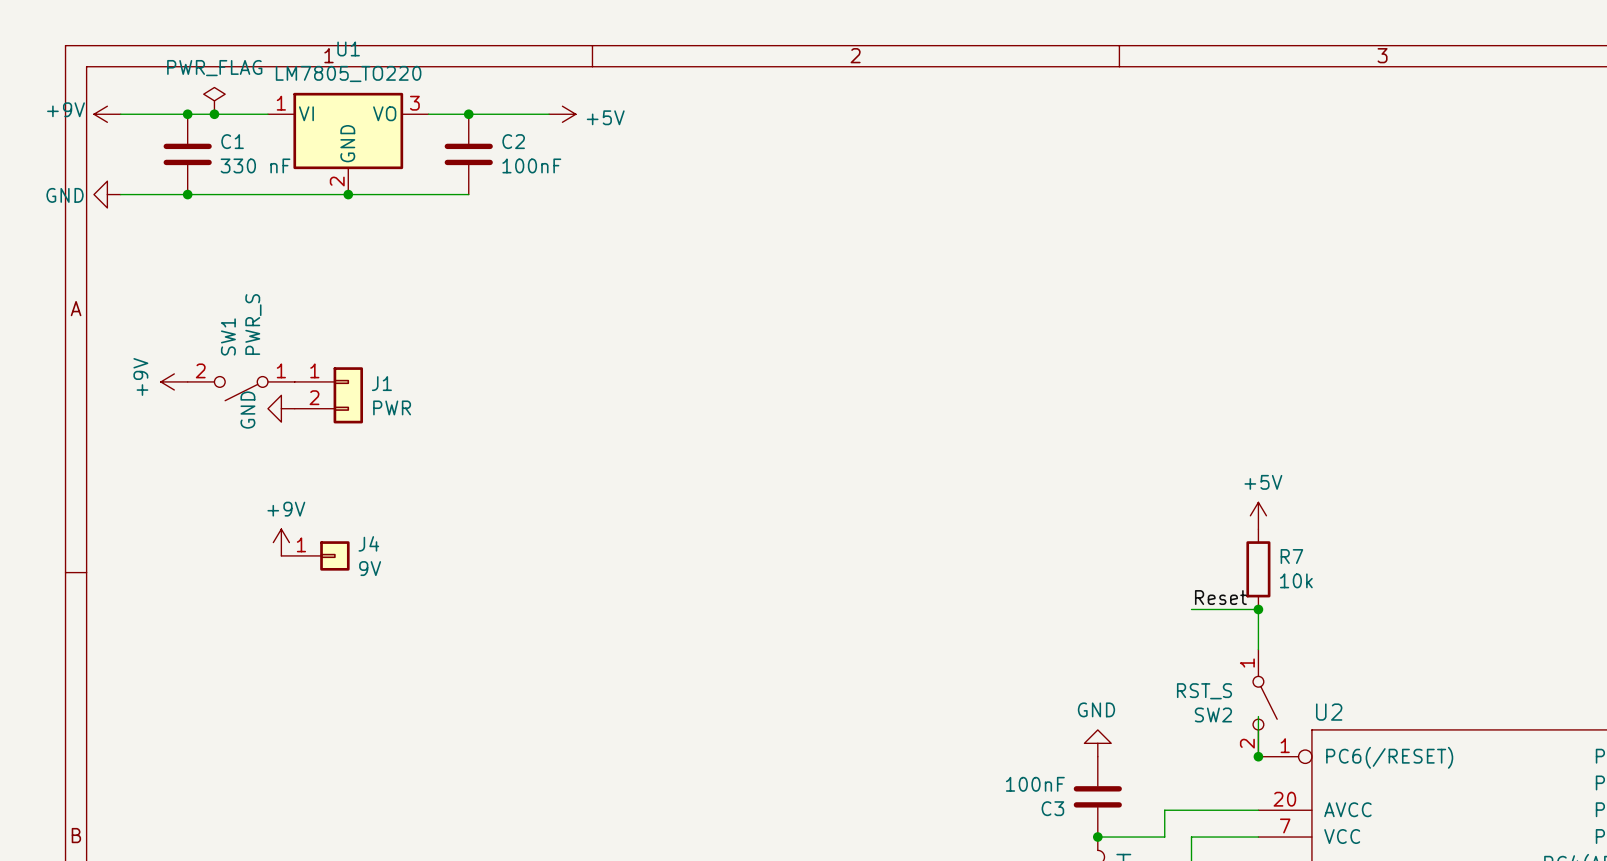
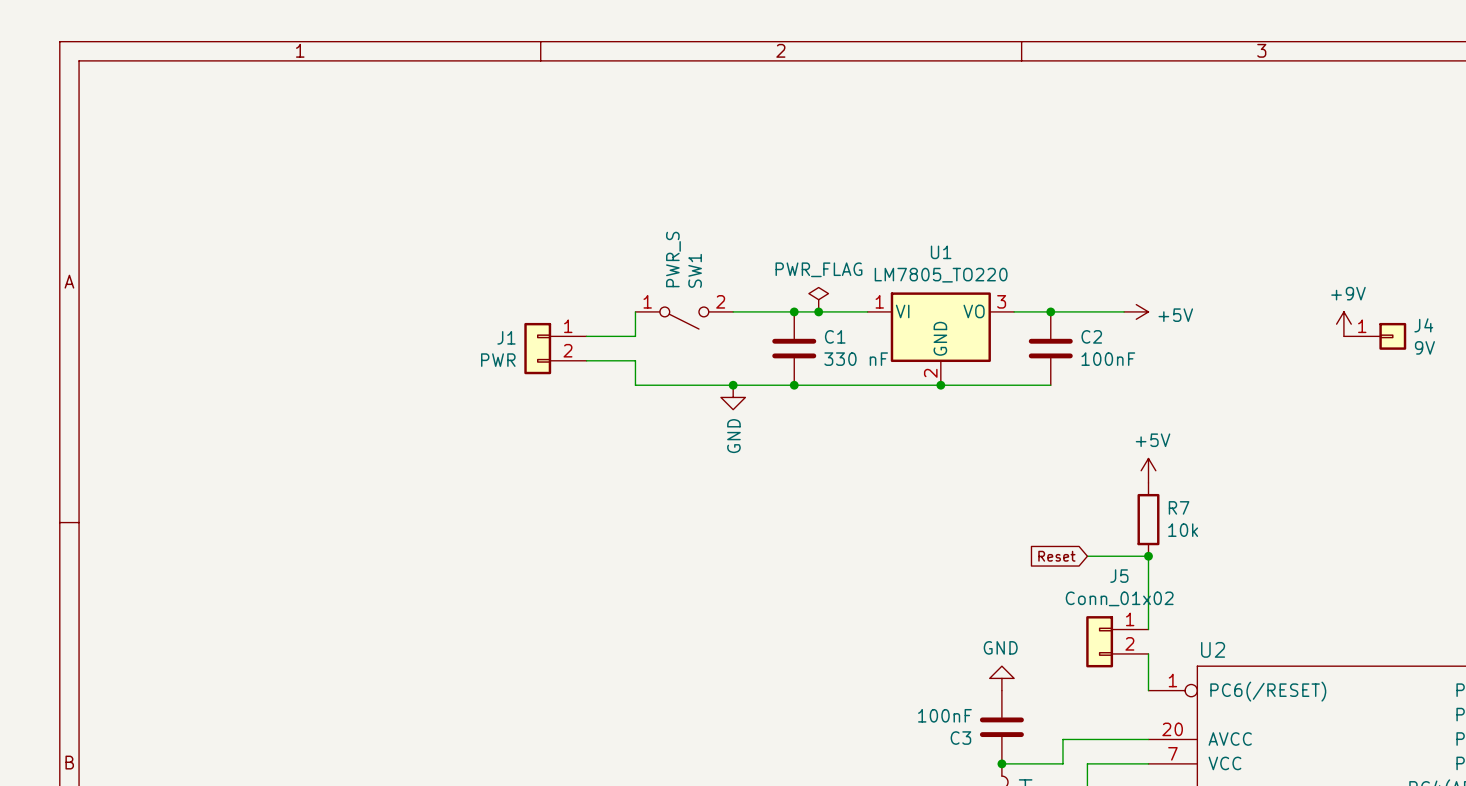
power symbol: PWR_FLAG (214, 100) -> none
power symbol: +9V (107, 114) -> none
wire: (120, 114) (267, 114) -> none
junction: (187, 114) -> none
junction: (214, 114) -> none
wire: (428, 114) (549, 114) -> none
junction: (468, 114) -> none
power symbol: +5V (562, 114) -> none
U1 position: (348, 143) -> (940, 338)
C1 position: (187, 154) -> (794, 348)
C2 position: (468, 154) -> (1050, 348)
power symbol: GND (107, 194) -> none
wire: (120, 194) (468, 194) -> none
junction: (187, 194) -> none
junction: (348, 194) -> none
power symbol: none -> PWR_FLAG (818, 299)
wire: none -> (635, 311) (635, 336) (586, 336)
wire: none -> (733, 311) (867, 311)
junction: none -> (794, 311)
junction: none -> (818, 311)
wire: none -> (1014, 311) (1124, 311)
junction: none -> (1050, 311)
power symbol: none -> +5V (1136, 311)
power symbol: none -> +9V (1343, 324)
power symbol: +9V (174, 381) -> none
SW1 flip: as is (241, 388) -> left-right (684, 318)
SW1 position: (241, 388) -> (684, 318)
J1 position: (328, 395) -> (555, 348)
J1 flip: as is (348, 395) -> left-right (537, 348)
wire: none -> (586, 360) (635, 360) (635, 385) (1050, 385)
power symbol: GND (281, 408) -> none
junction: none -> (733, 385)
junction: none -> (794, 385)
junction: none -> (940, 385)
power symbol: none -> GND (733, 397)
power symbol: +9V (281, 542) -> none
J4 position: (315, 555) -> (1375, 336)
label: Reset (1220, 597) -> none
global label: none -> Reset (1056, 556)
J5: none -> Conn_01x02 (1117, 641)
SW2: RST_S (1265, 703) -> none
junction: (1258, 756) -> none

